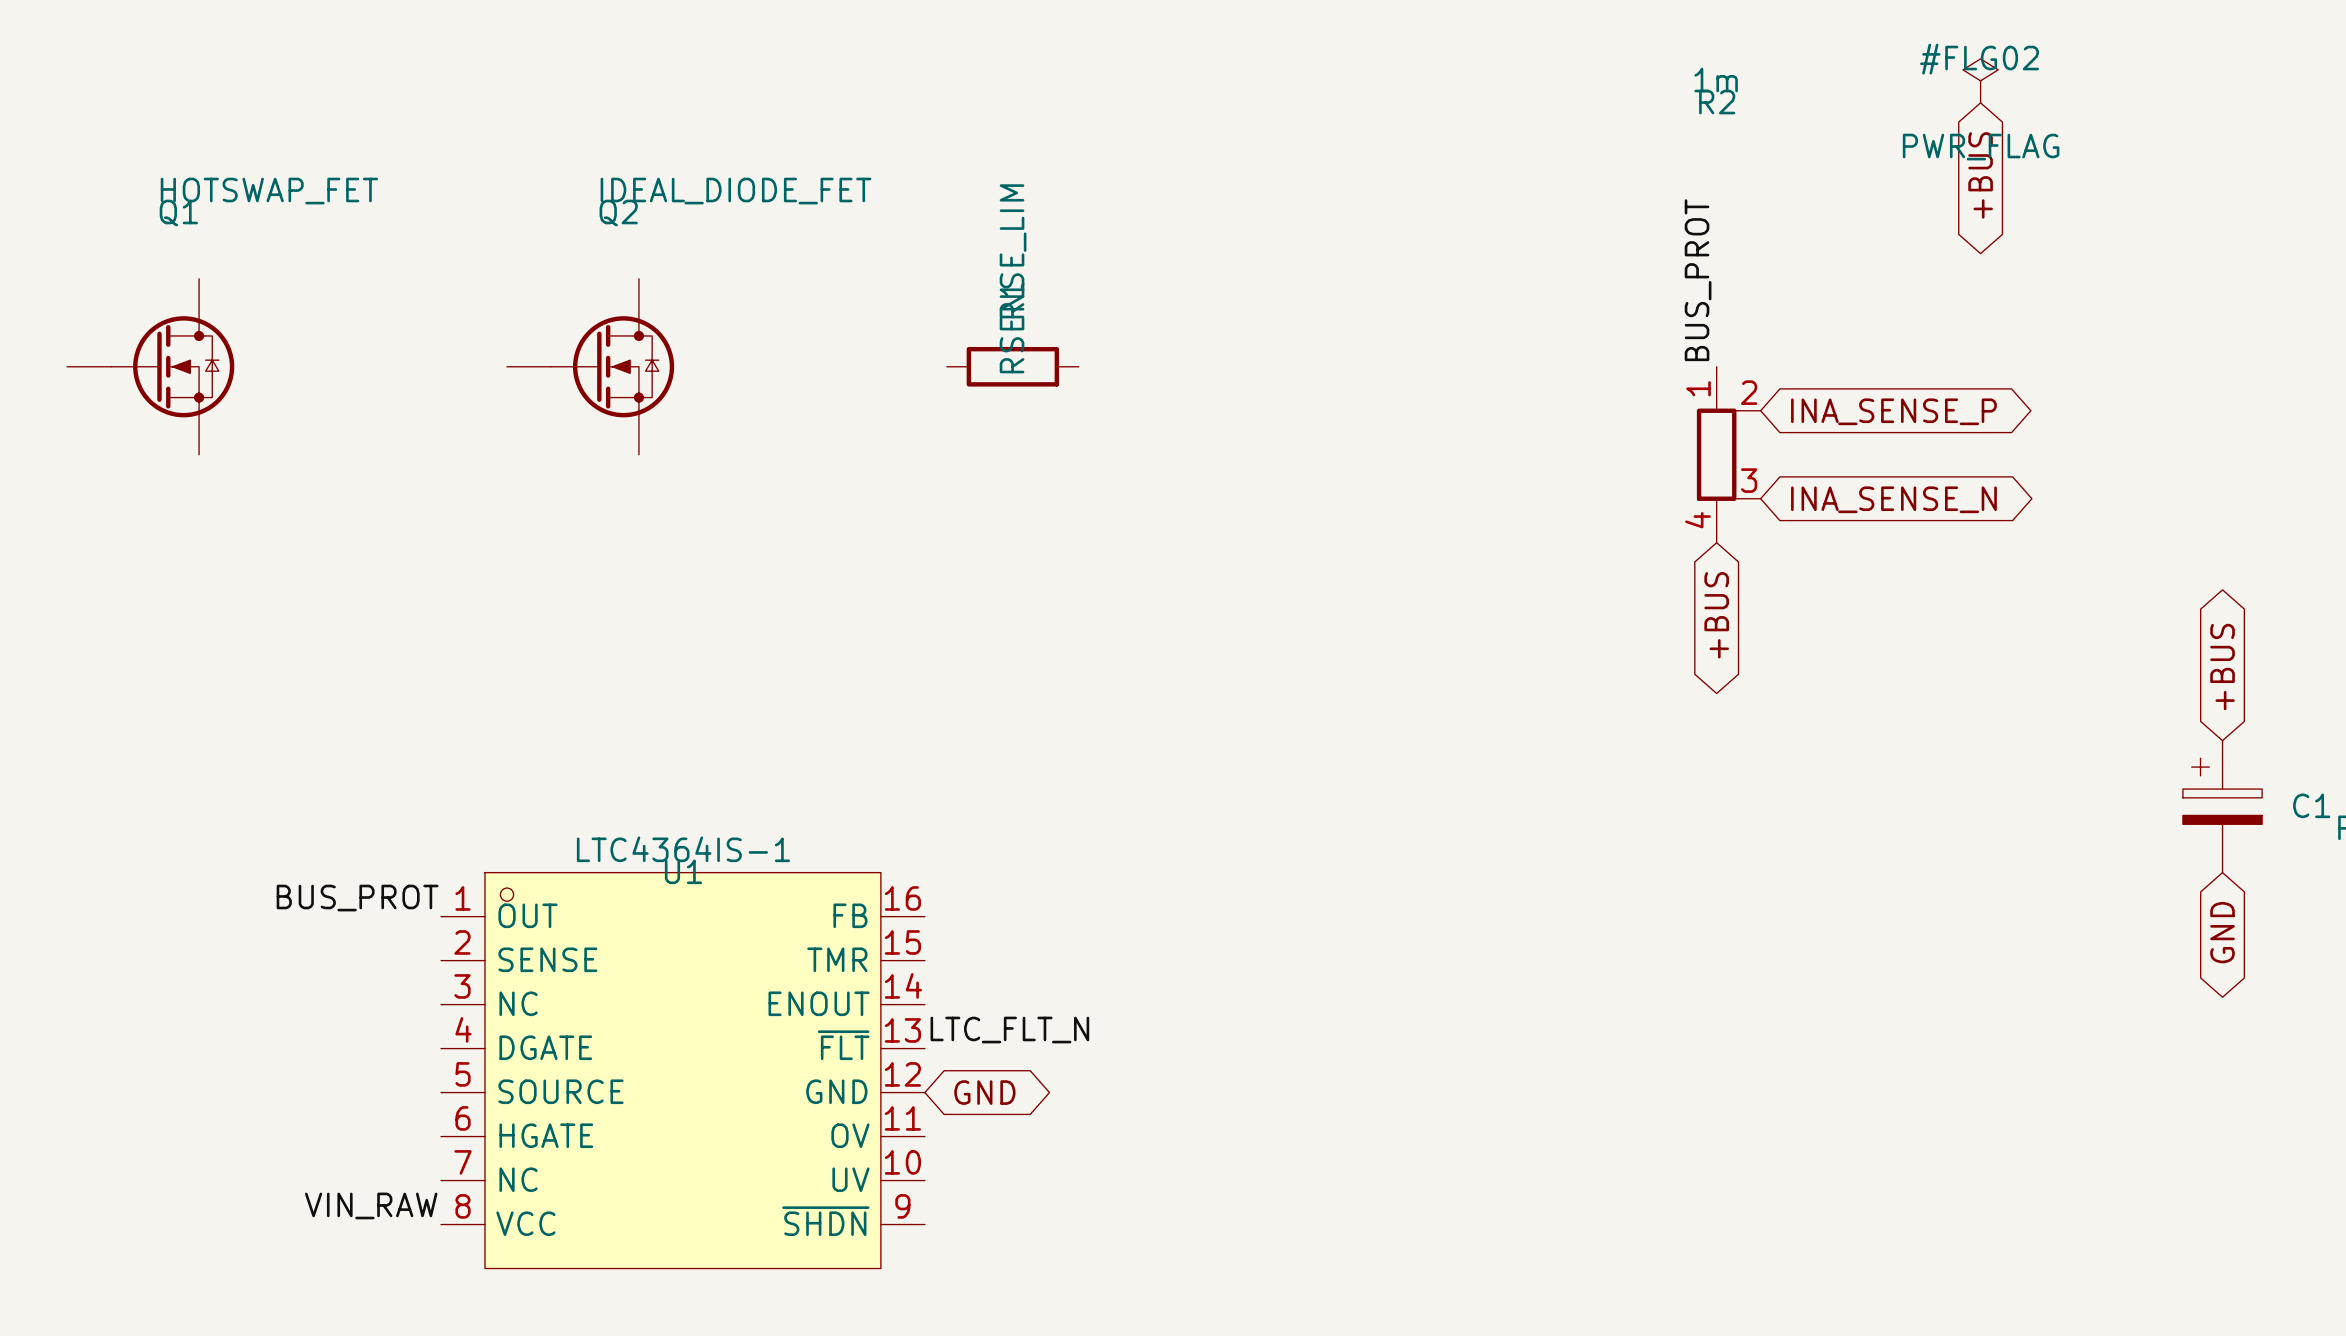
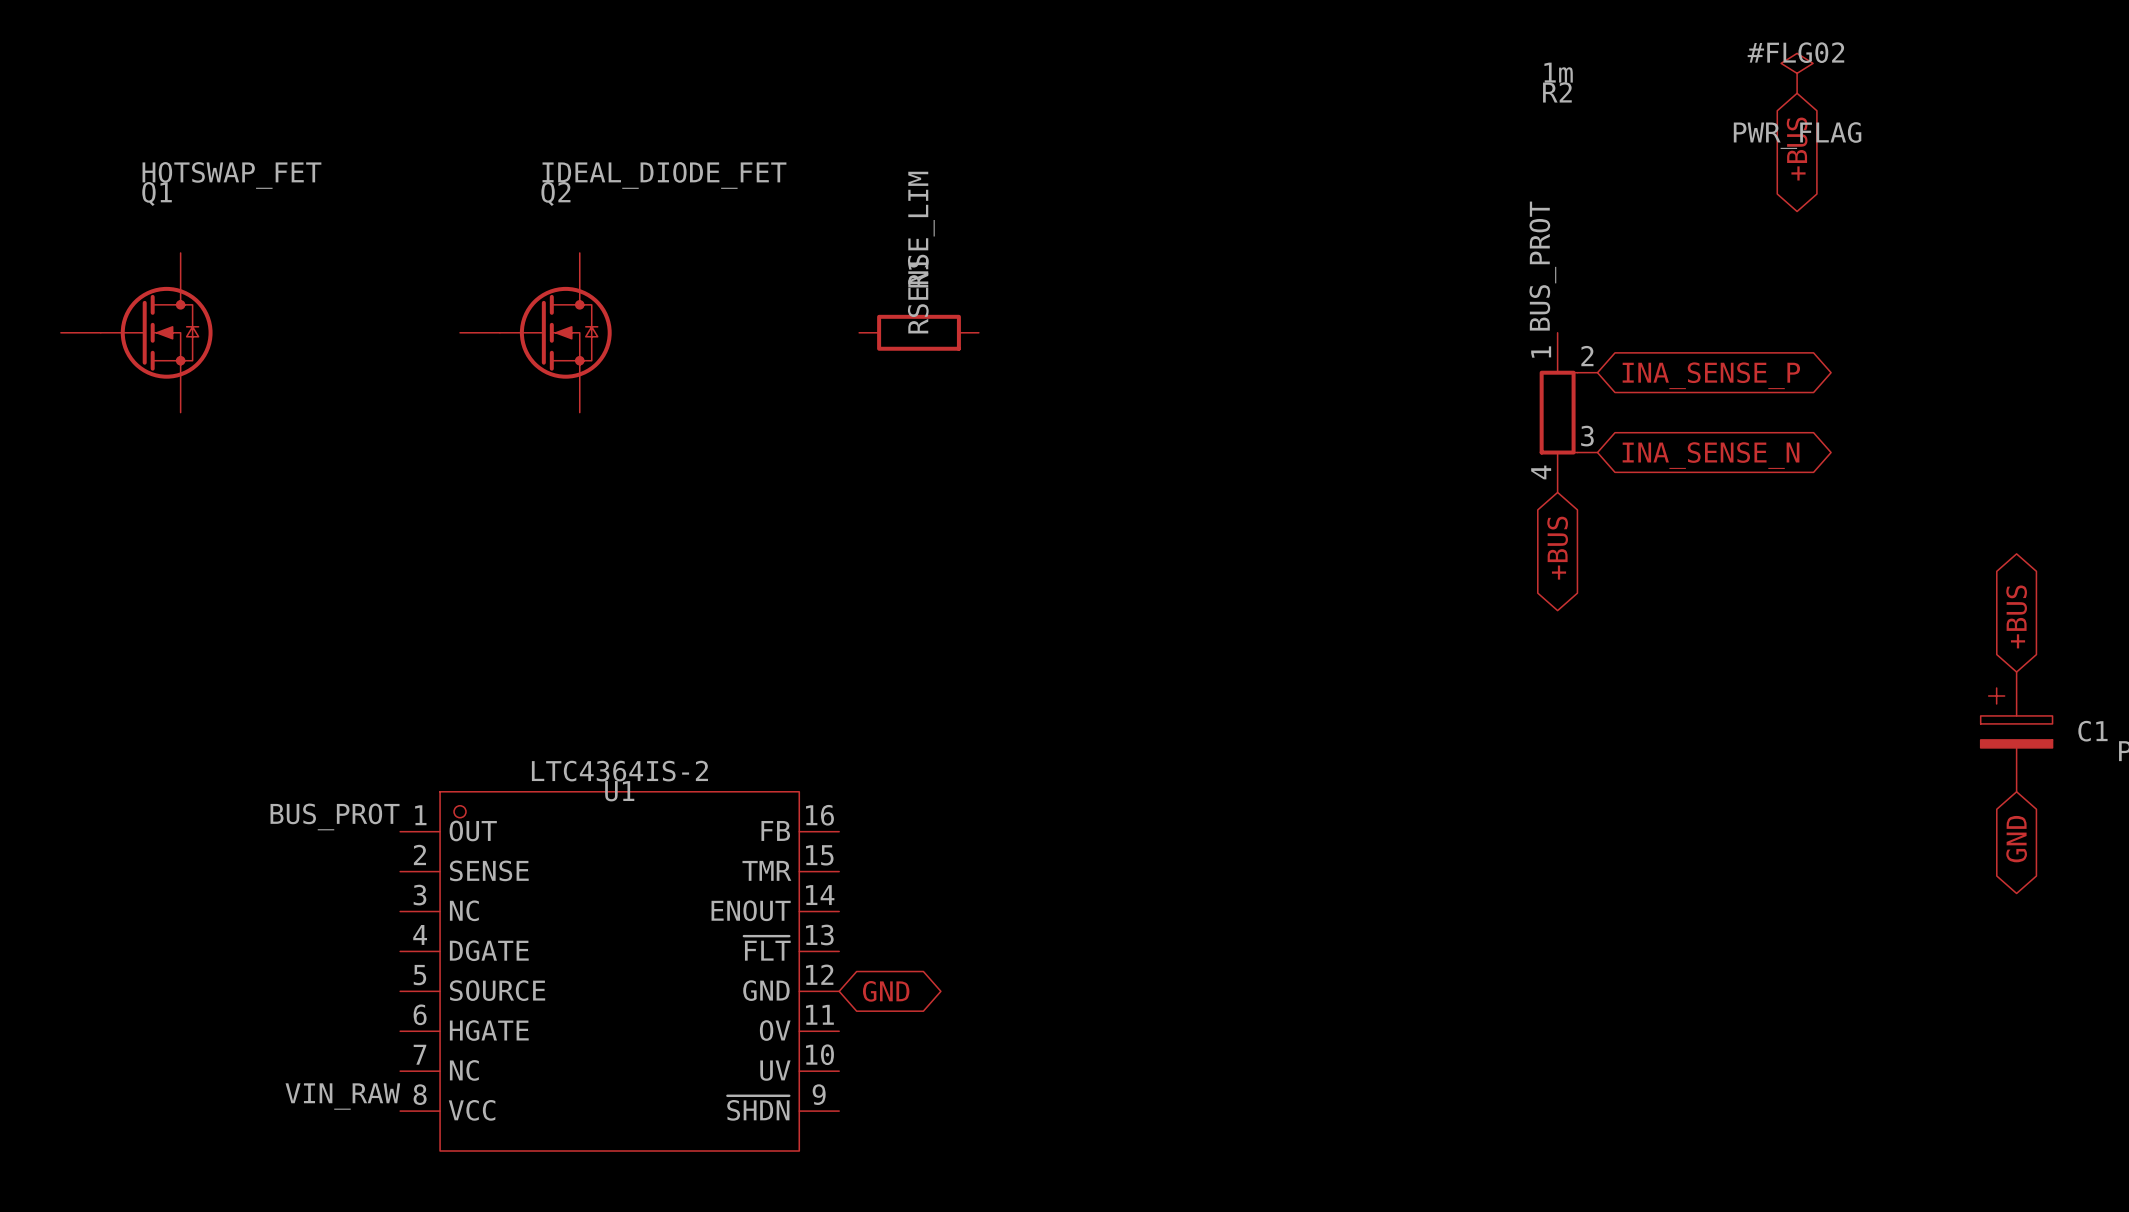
U1 value: LTC4364IS-1 (683, 849) -> LTC4364IS-2 (619, 771)
label: LTC_FLT_N (1009, 1030) -> none

